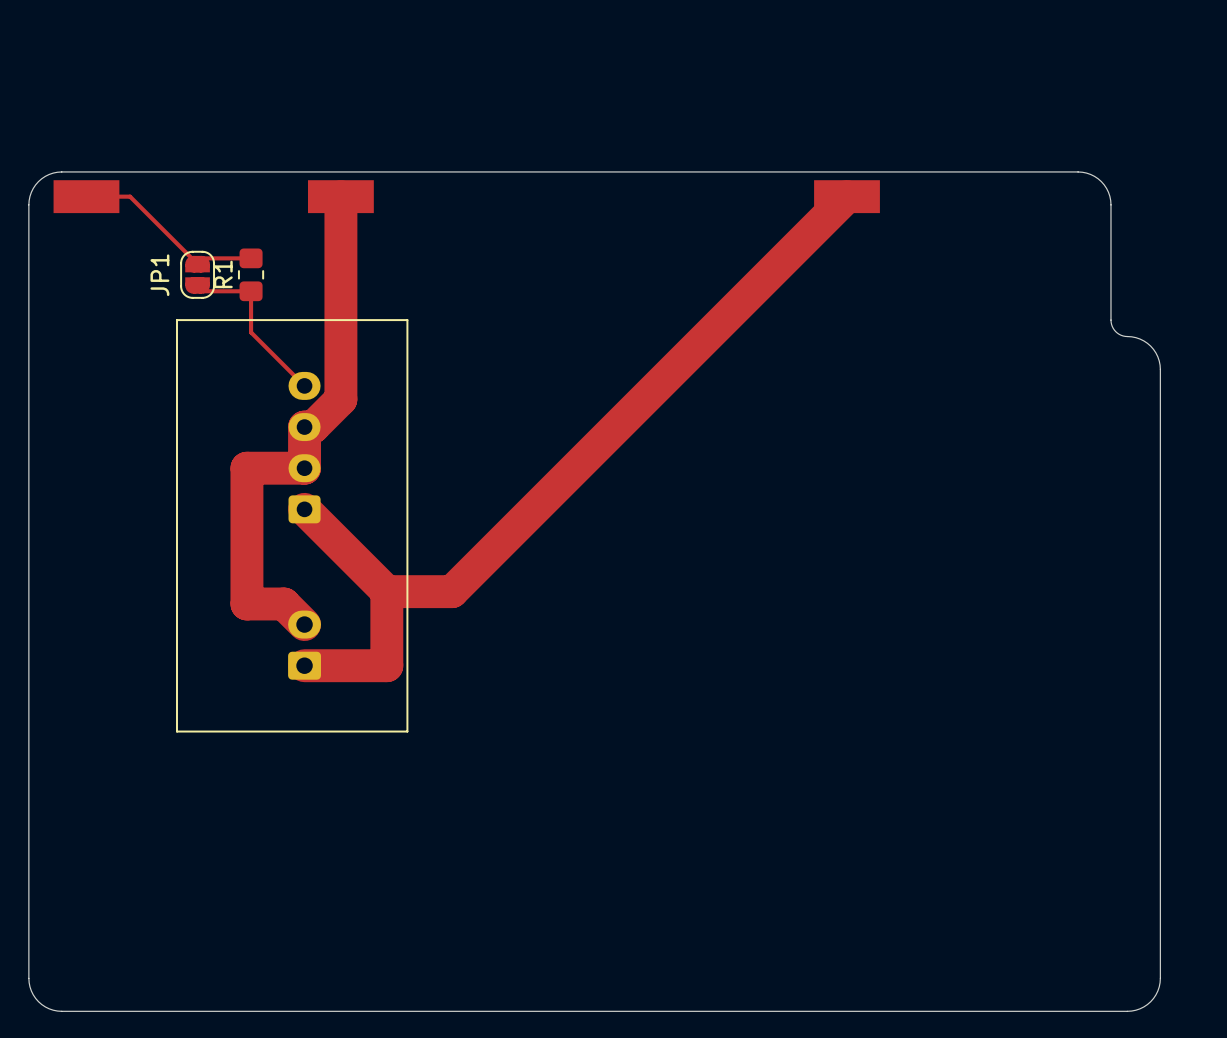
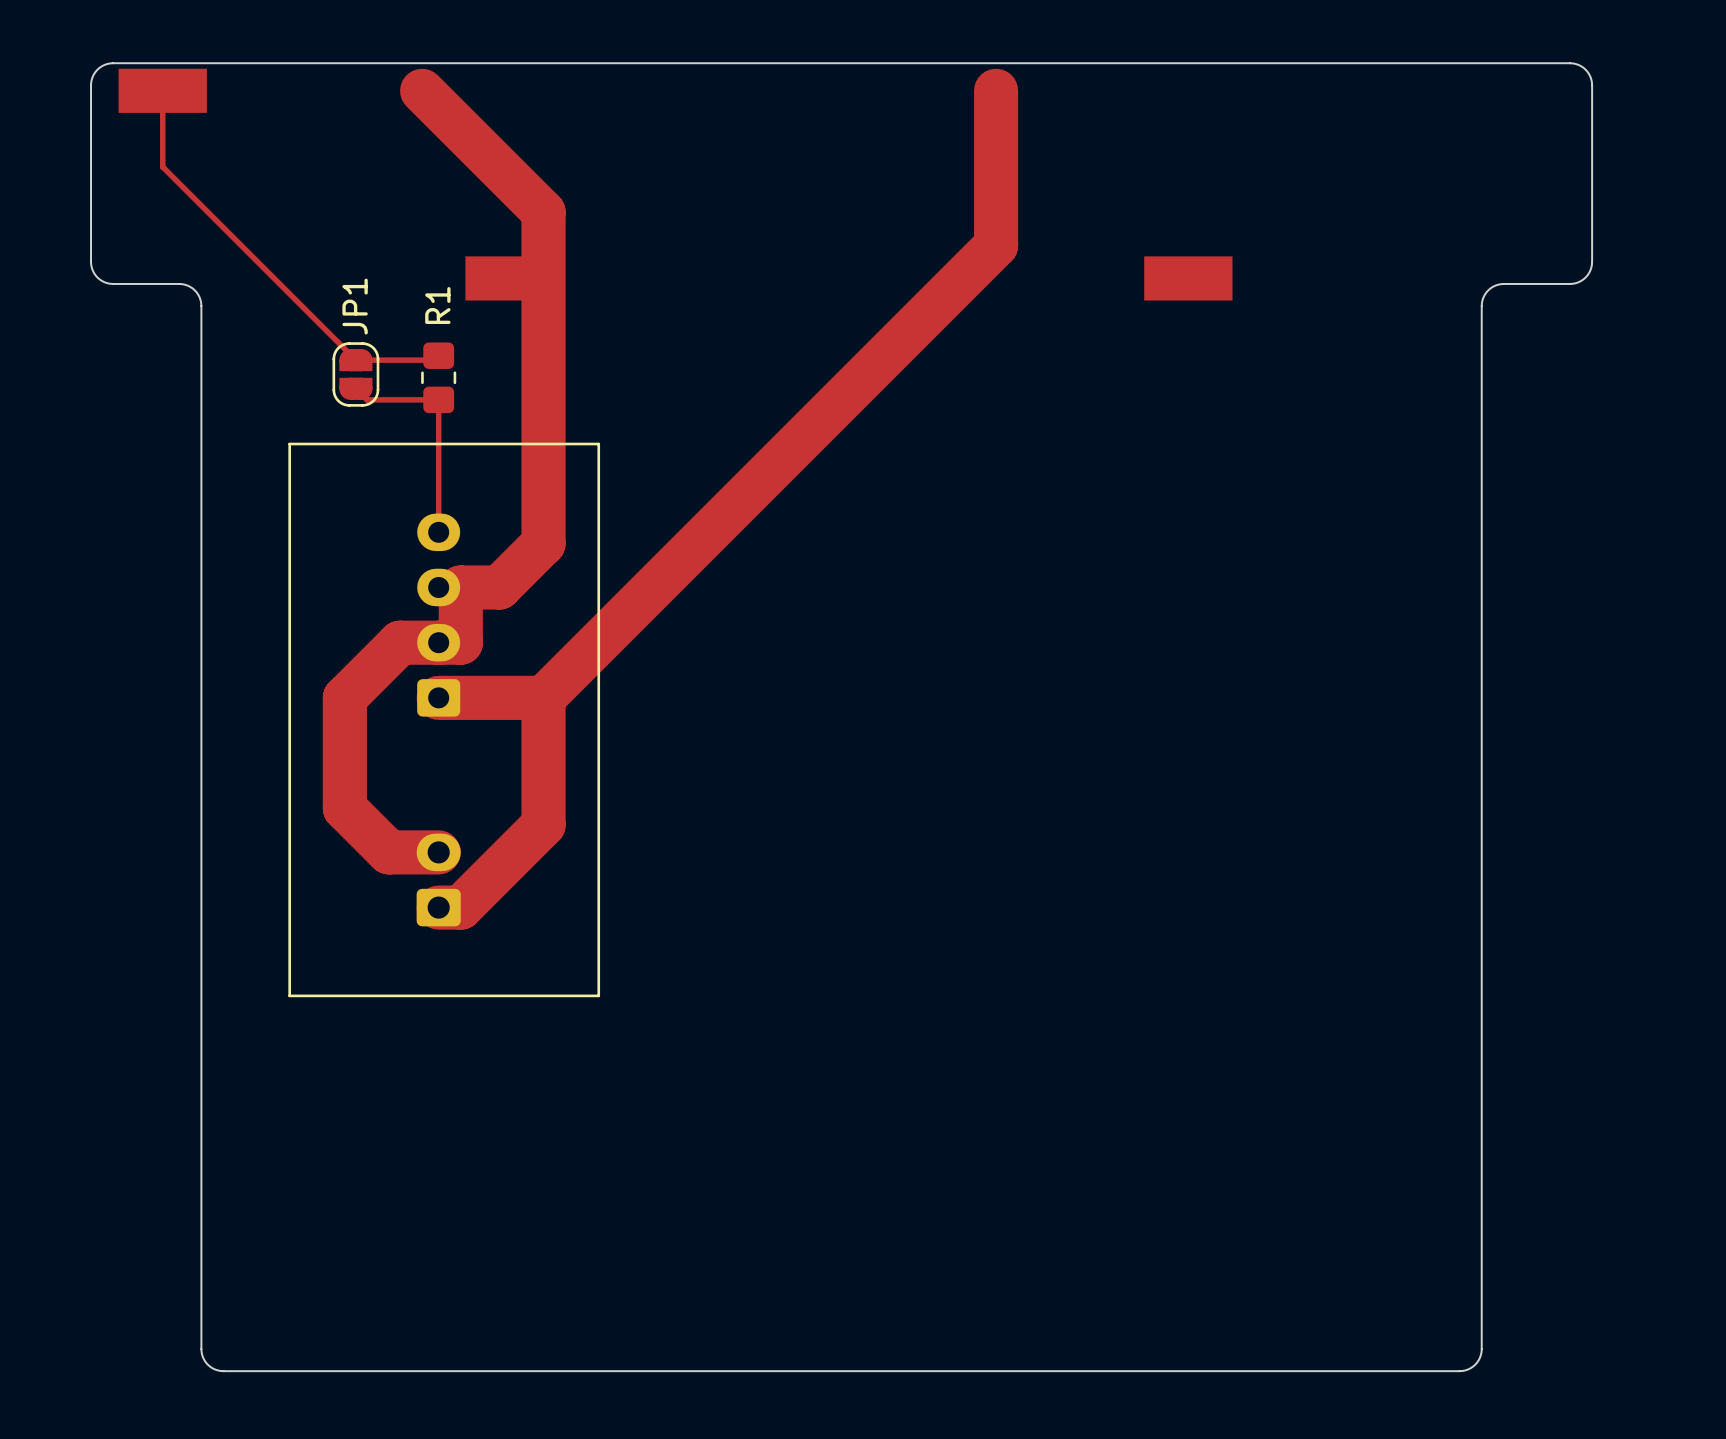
track: none -> (162, 90) (162, 166) (355, 360) (434, 360) (438, 355)
track: none -> (996, 90) (996, 245) (543, 697)
track: (86, 196) (130, 196) (197, 264) (203, 258) (251, 258) -> none
part position: (86, 196) -> (162, 90)
track: (340, 196) (340, 399) (313, 427) -> (422, 90) (543, 212) (543, 543) (499, 587) (472, 587)
track: (847, 196) (452, 591) (386, 591) -> none
JP1 position: (197, 274) -> (355, 374)
R1 name position: R1 (223, 274) -> R1 (437, 305)
R1 position: (251, 274) -> (438, 377)
JP1 name position: JP1 (159, 275) -> JP1 (355, 306)
track: none -> (355, 388) (366, 399) (438, 399) (438, 532)
track: (197, 285) (203, 291) (251, 291) (251, 332) (304, 385) -> none
part position: (304, 447) -> (438, 615)
track: (259, 468) (246, 468) (246, 603) (283, 603) (304, 624) -> (400, 642) (344, 697) (344, 808) (389, 852) (438, 852)
track: none -> (438, 697) (543, 697)
track: (304, 509) (386, 591) -> none
track: none -> (543, 697) (543, 824) (460, 907) (438, 907)
track: (386, 591) (386, 665) (304, 665) -> none
part position: (304, 645) -> (438, 879)
board edge: (127, 1011) (53, 1010) (38, 1001) (31, 991) (29, 982) (28, 204) (31, 192) (38, 181) (45, 176) (57, 172) (1078, 171) (1086, 173) (1098, 178) (1106, 188) (1110, 200) (1111, 324) (1119, 334) (1135, 337) (1147, 343) (1155, 353) (1160, 365) (1160, 978) (1157, 991) (1153, 998) (1143, 1006) (1135, 1010) (1049, 1011) -> (223, 1371) (215, 1369) (207, 1364) (203, 1357) (201, 1349) (201, 303) (196, 292) (185, 284) (110, 283) (99, 279) (92, 270) (91, 261) (91, 82) (97, 69) (110, 63) (1570, 63) (1578, 64) (1585, 69) (1590, 76) (1592, 85) (1592, 261) (1590, 270) (1583, 279) (1572, 283) (1498, 284) (1486, 292) (1481, 303) (1481, 1349) (1480, 1357) (1475, 1364) (1468, 1369) (1459, 1371)

